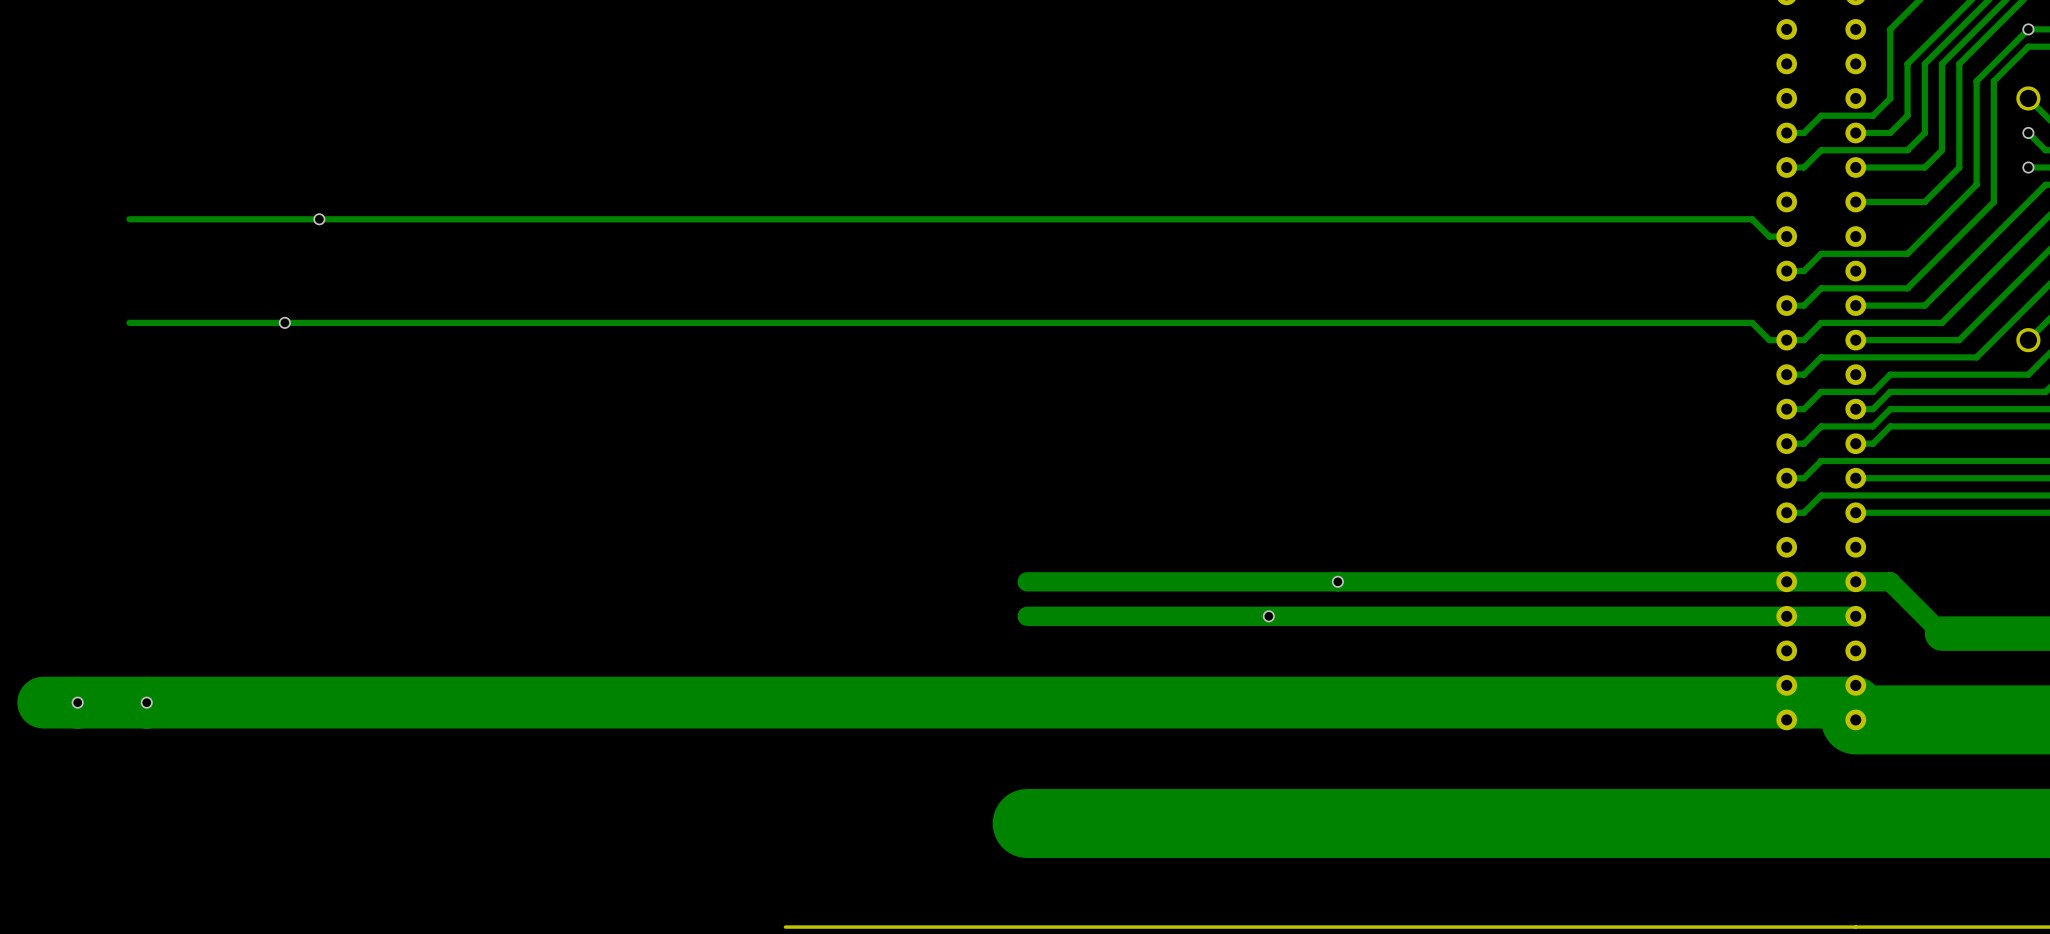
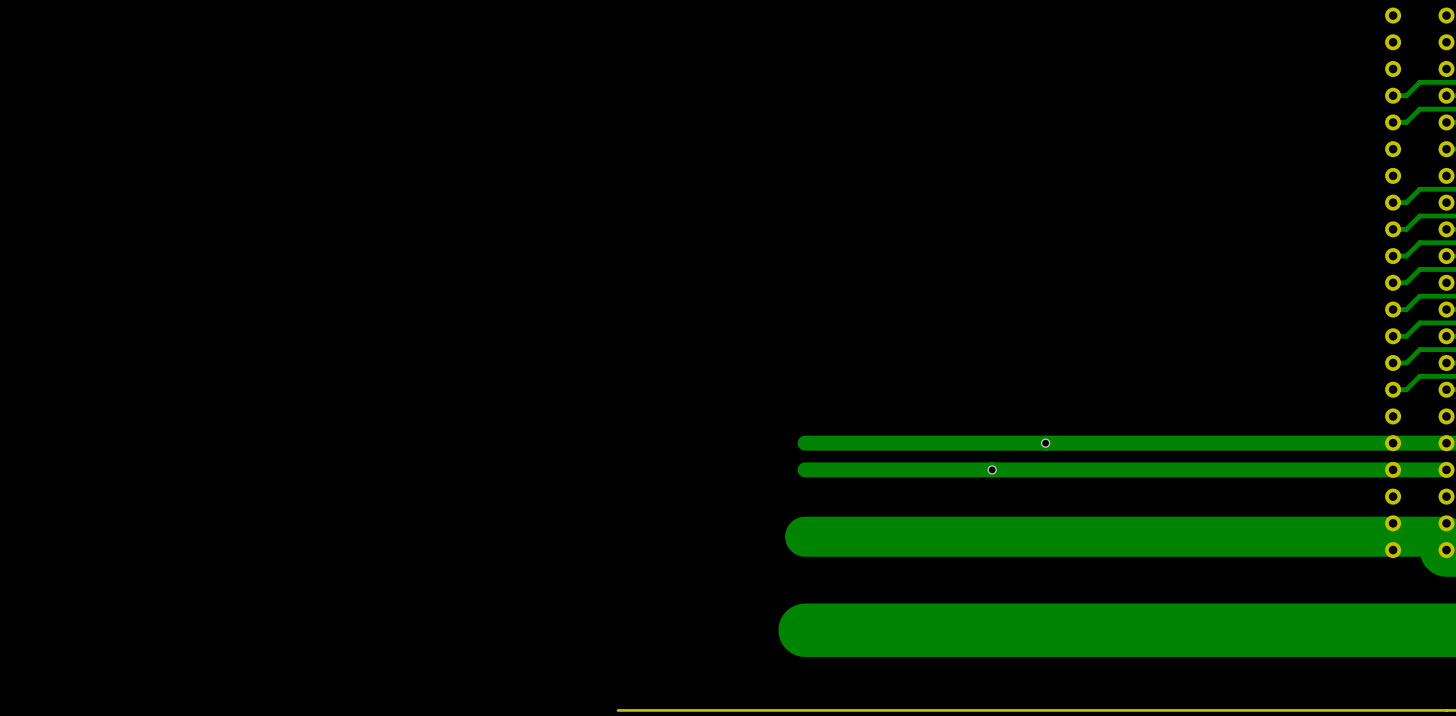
track: (129, 219) (1752, 219) (1769, 236) (1786, 236) -> none
via: (319, 219) -> none
track: (129, 322) (1752, 322) (1769, 340) (1786, 340) -> none
via: (284, 322) -> none
via: (77, 702) -> none
via: (146, 702) -> none
track: (1027, 702) (43, 702) -> none

